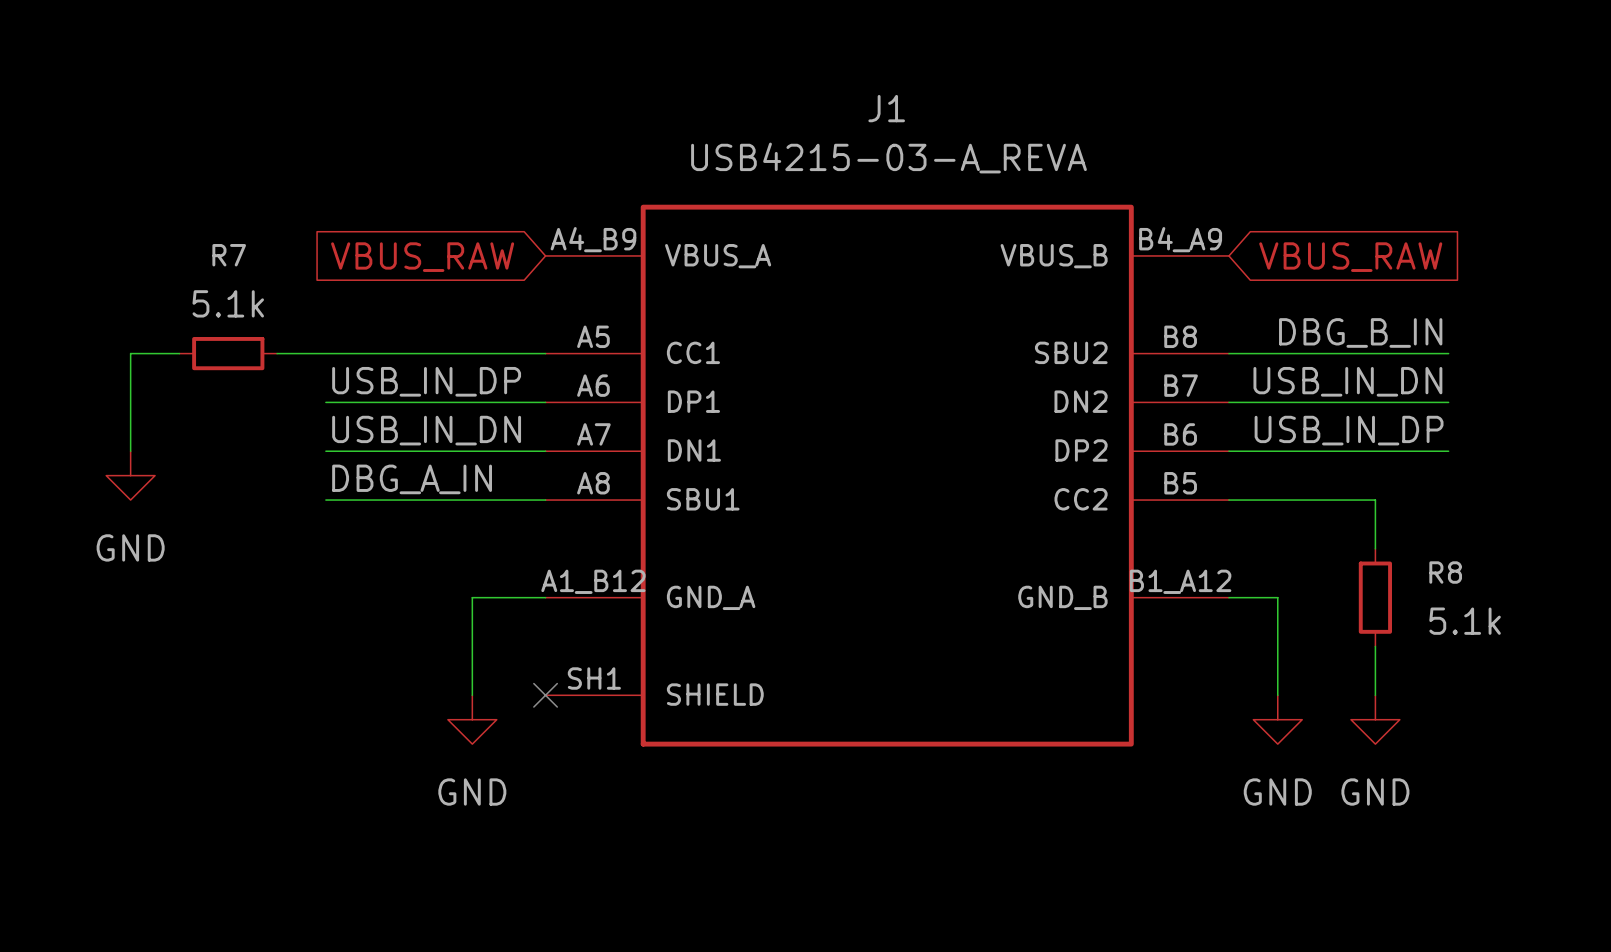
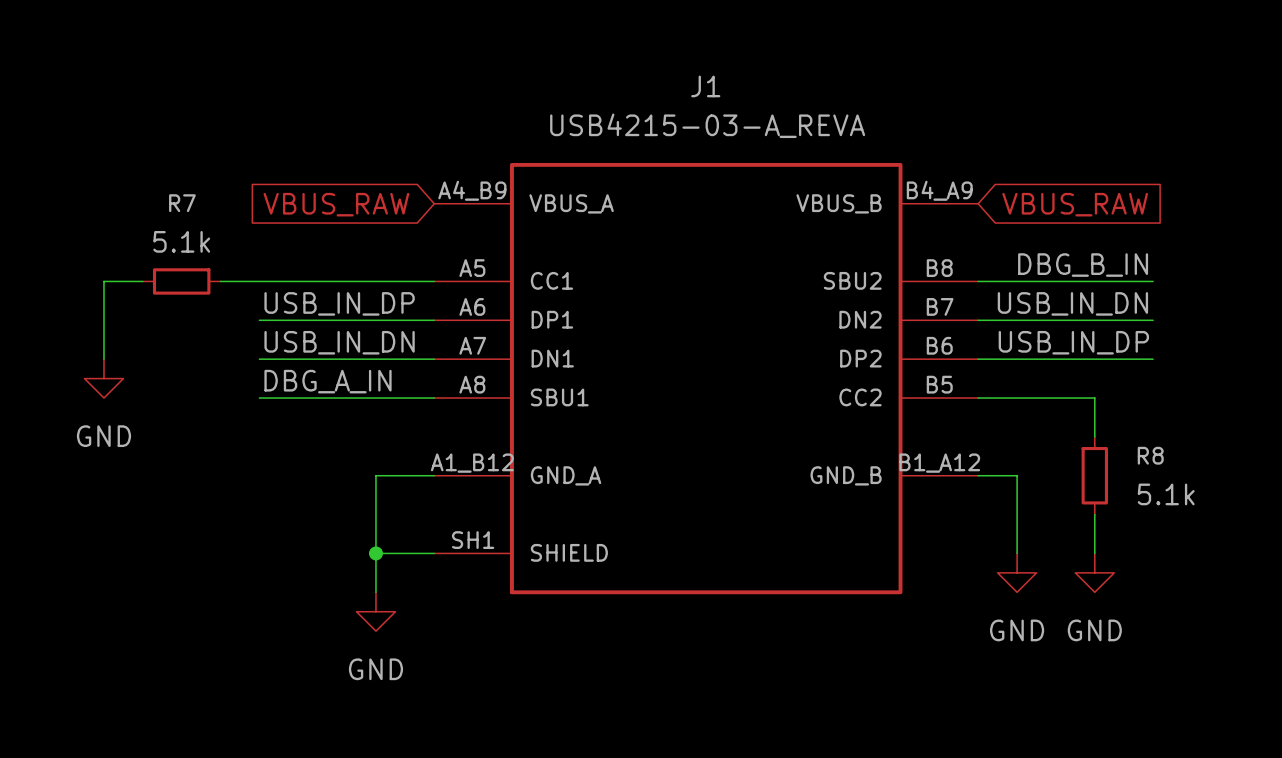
junction: none -> (375, 553)
wire: none -> (434, 553) (375, 553) (375, 592)
no-connect mark: (545, 695) -> none
power symbol position: GND (472, 719) -> GND (375, 611)

